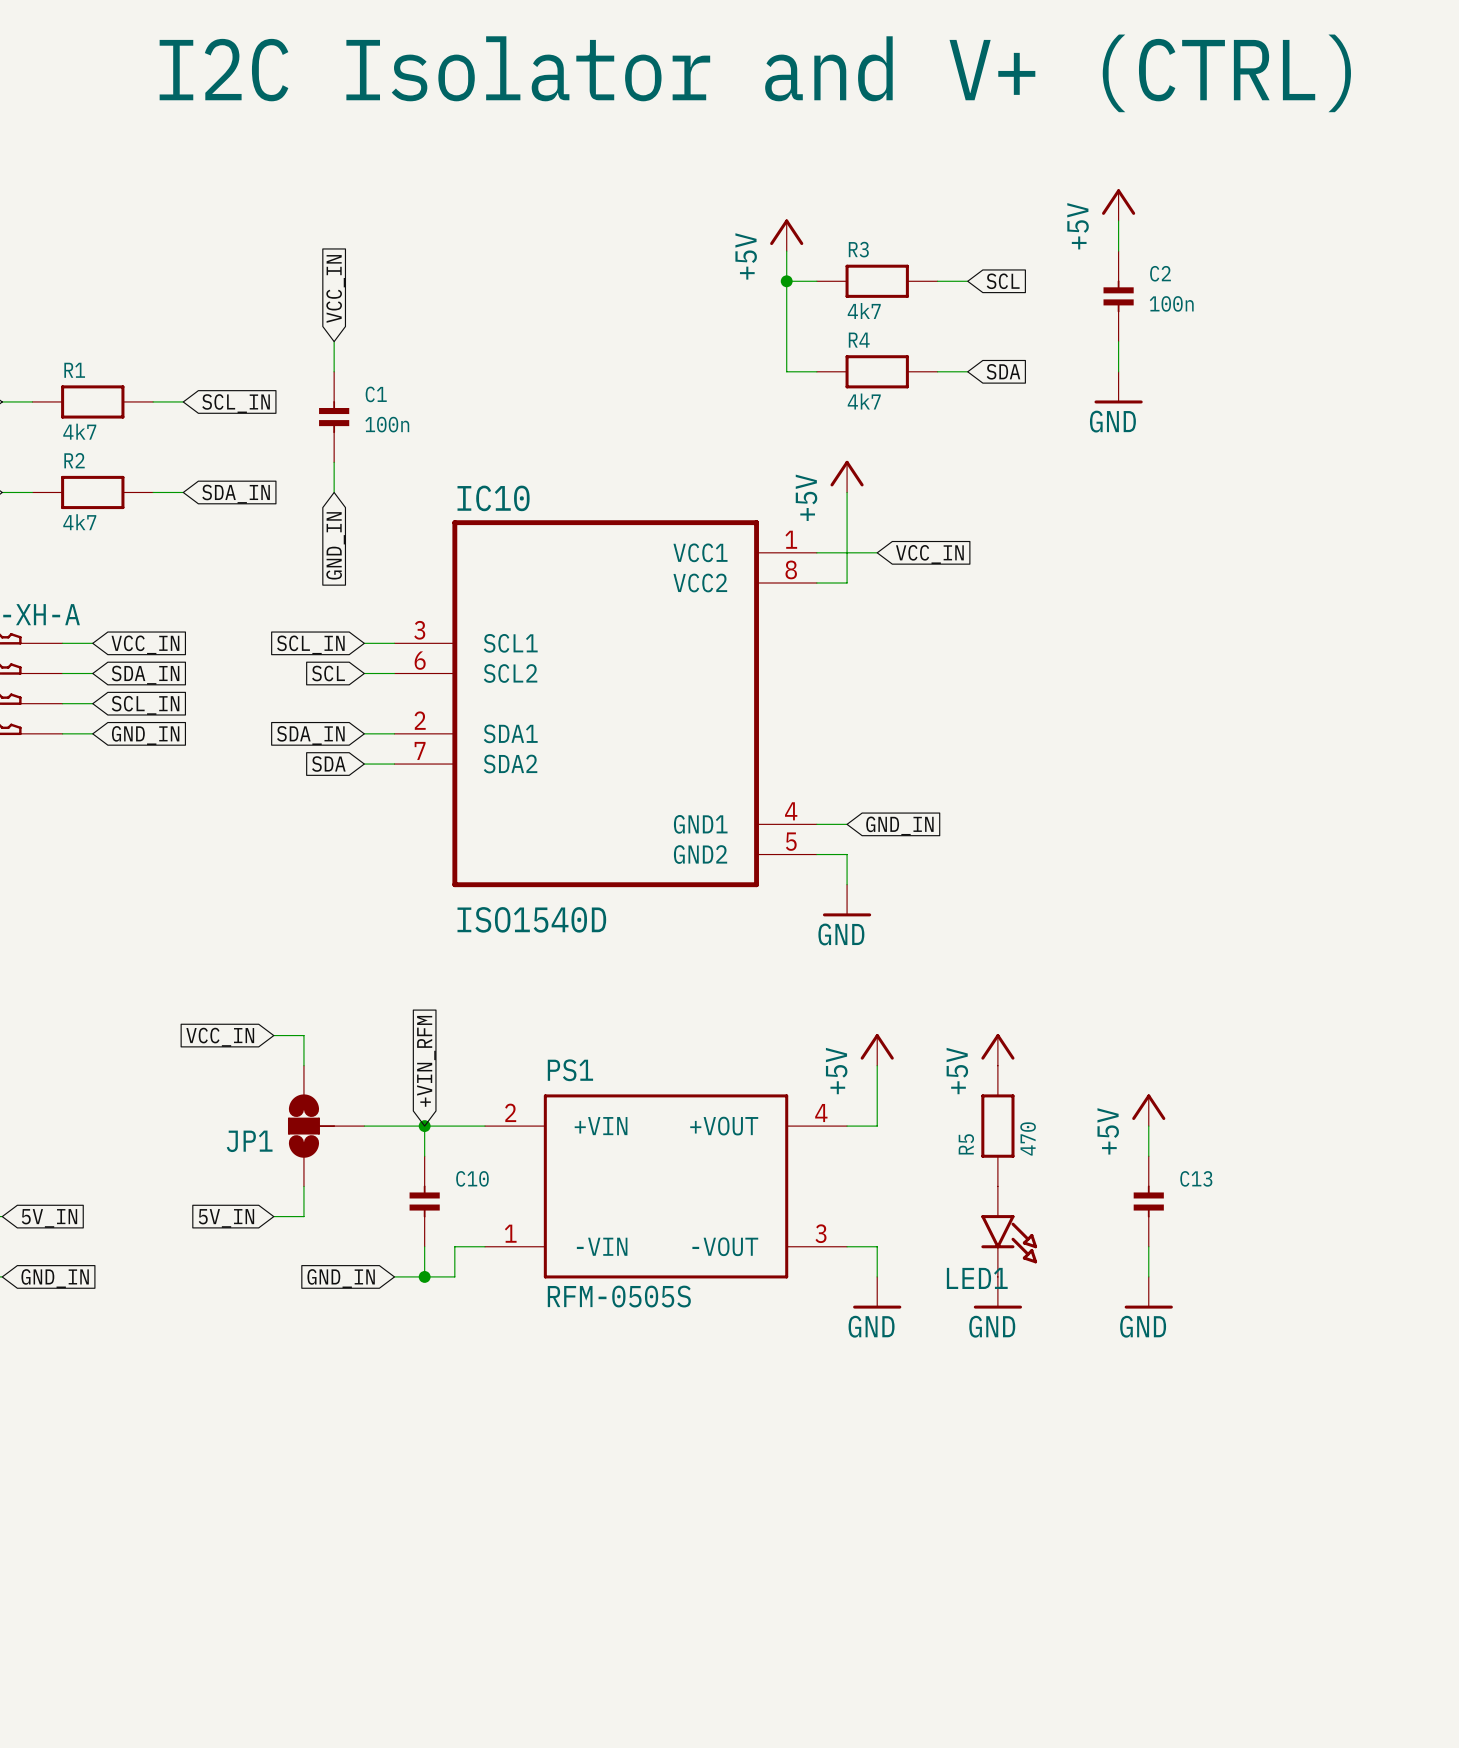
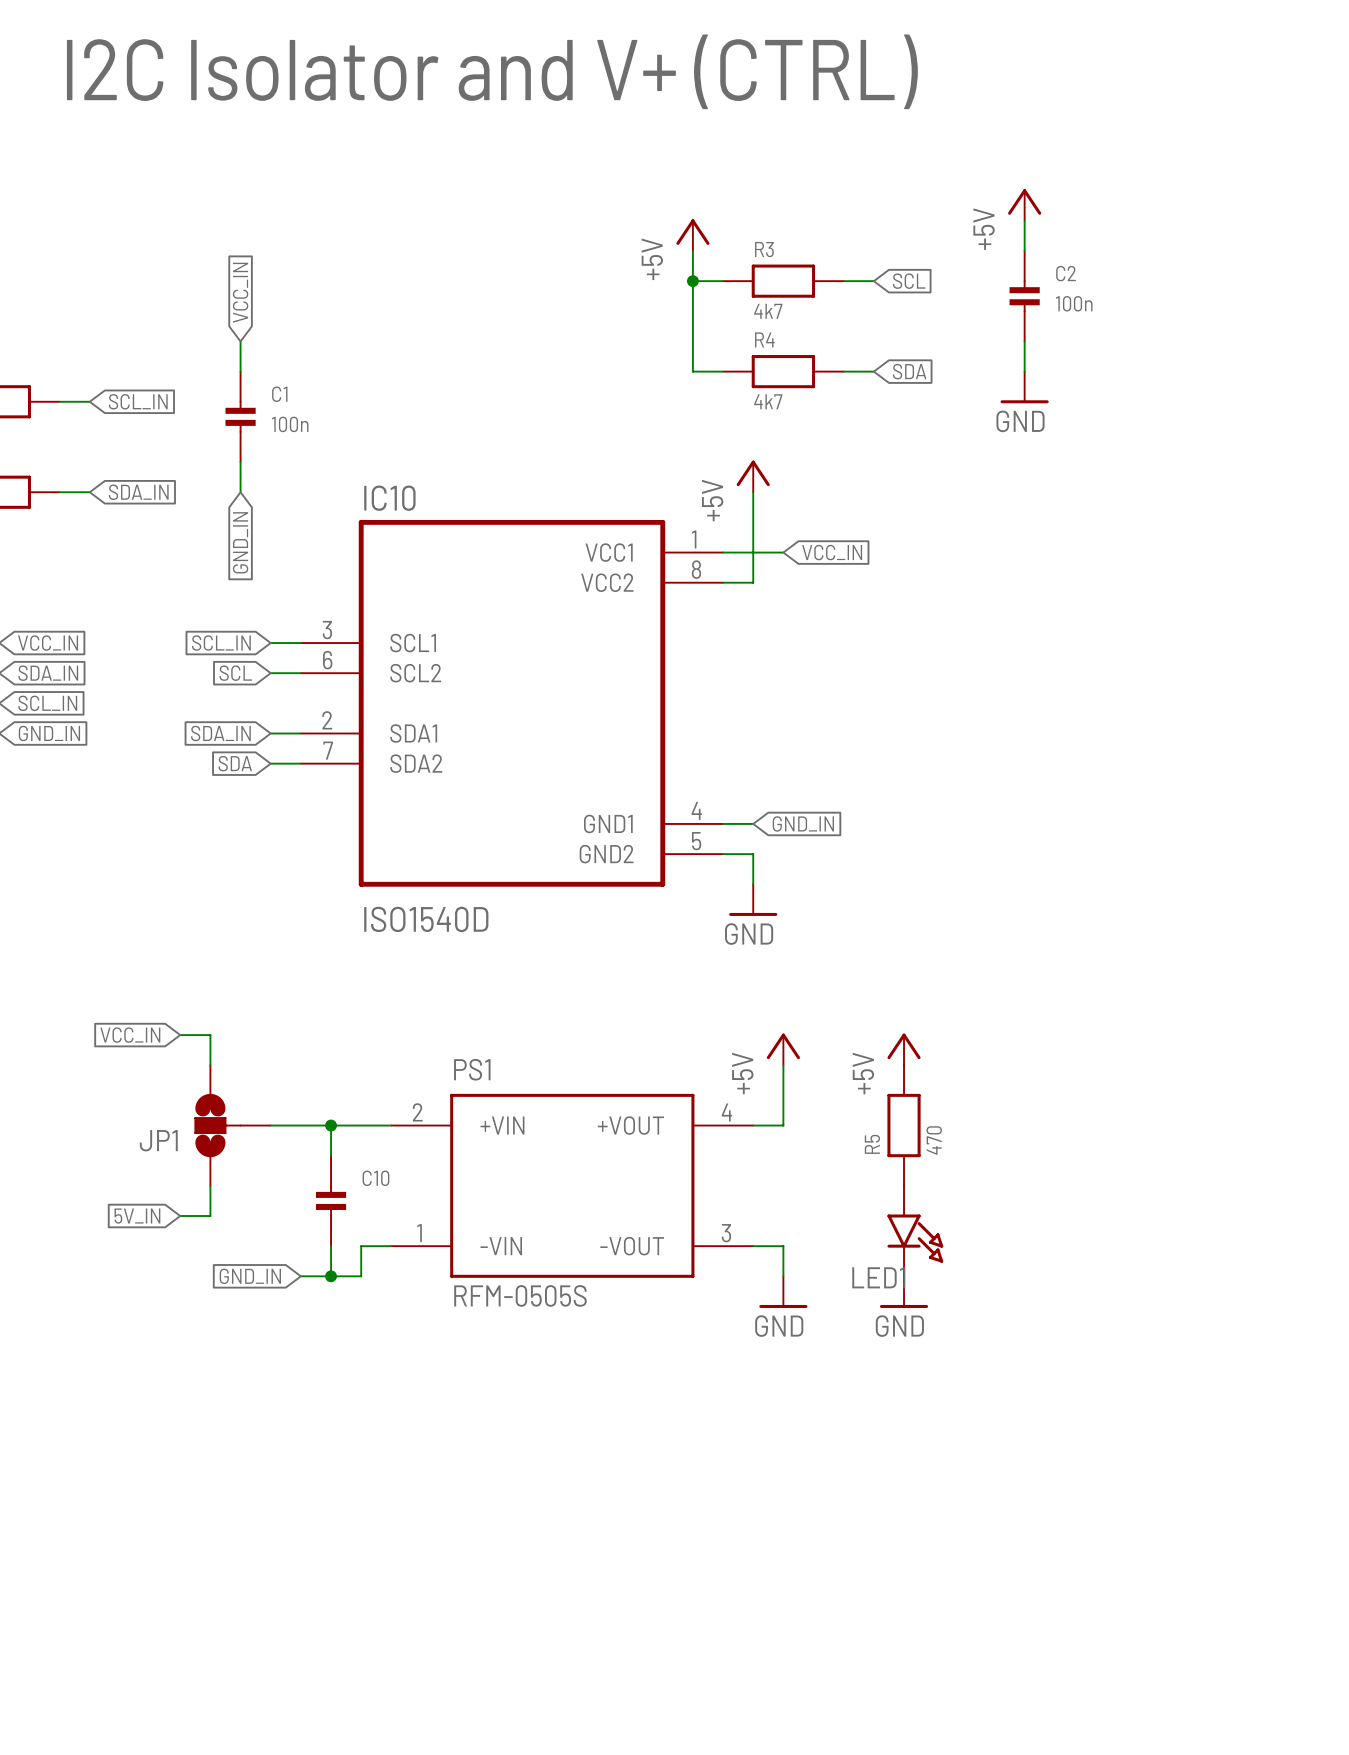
global label: +VIN_RFM (426, 1061) -> none
power symbol: +5V (1148, 1110) -> none
wire: (1148, 1126) (1148, 1156) -> none
C13: (1148, 1201) -> none
wire: (1148, 1246) (1148, 1276) -> none
power symbol: GND (1148, 1292) -> none

